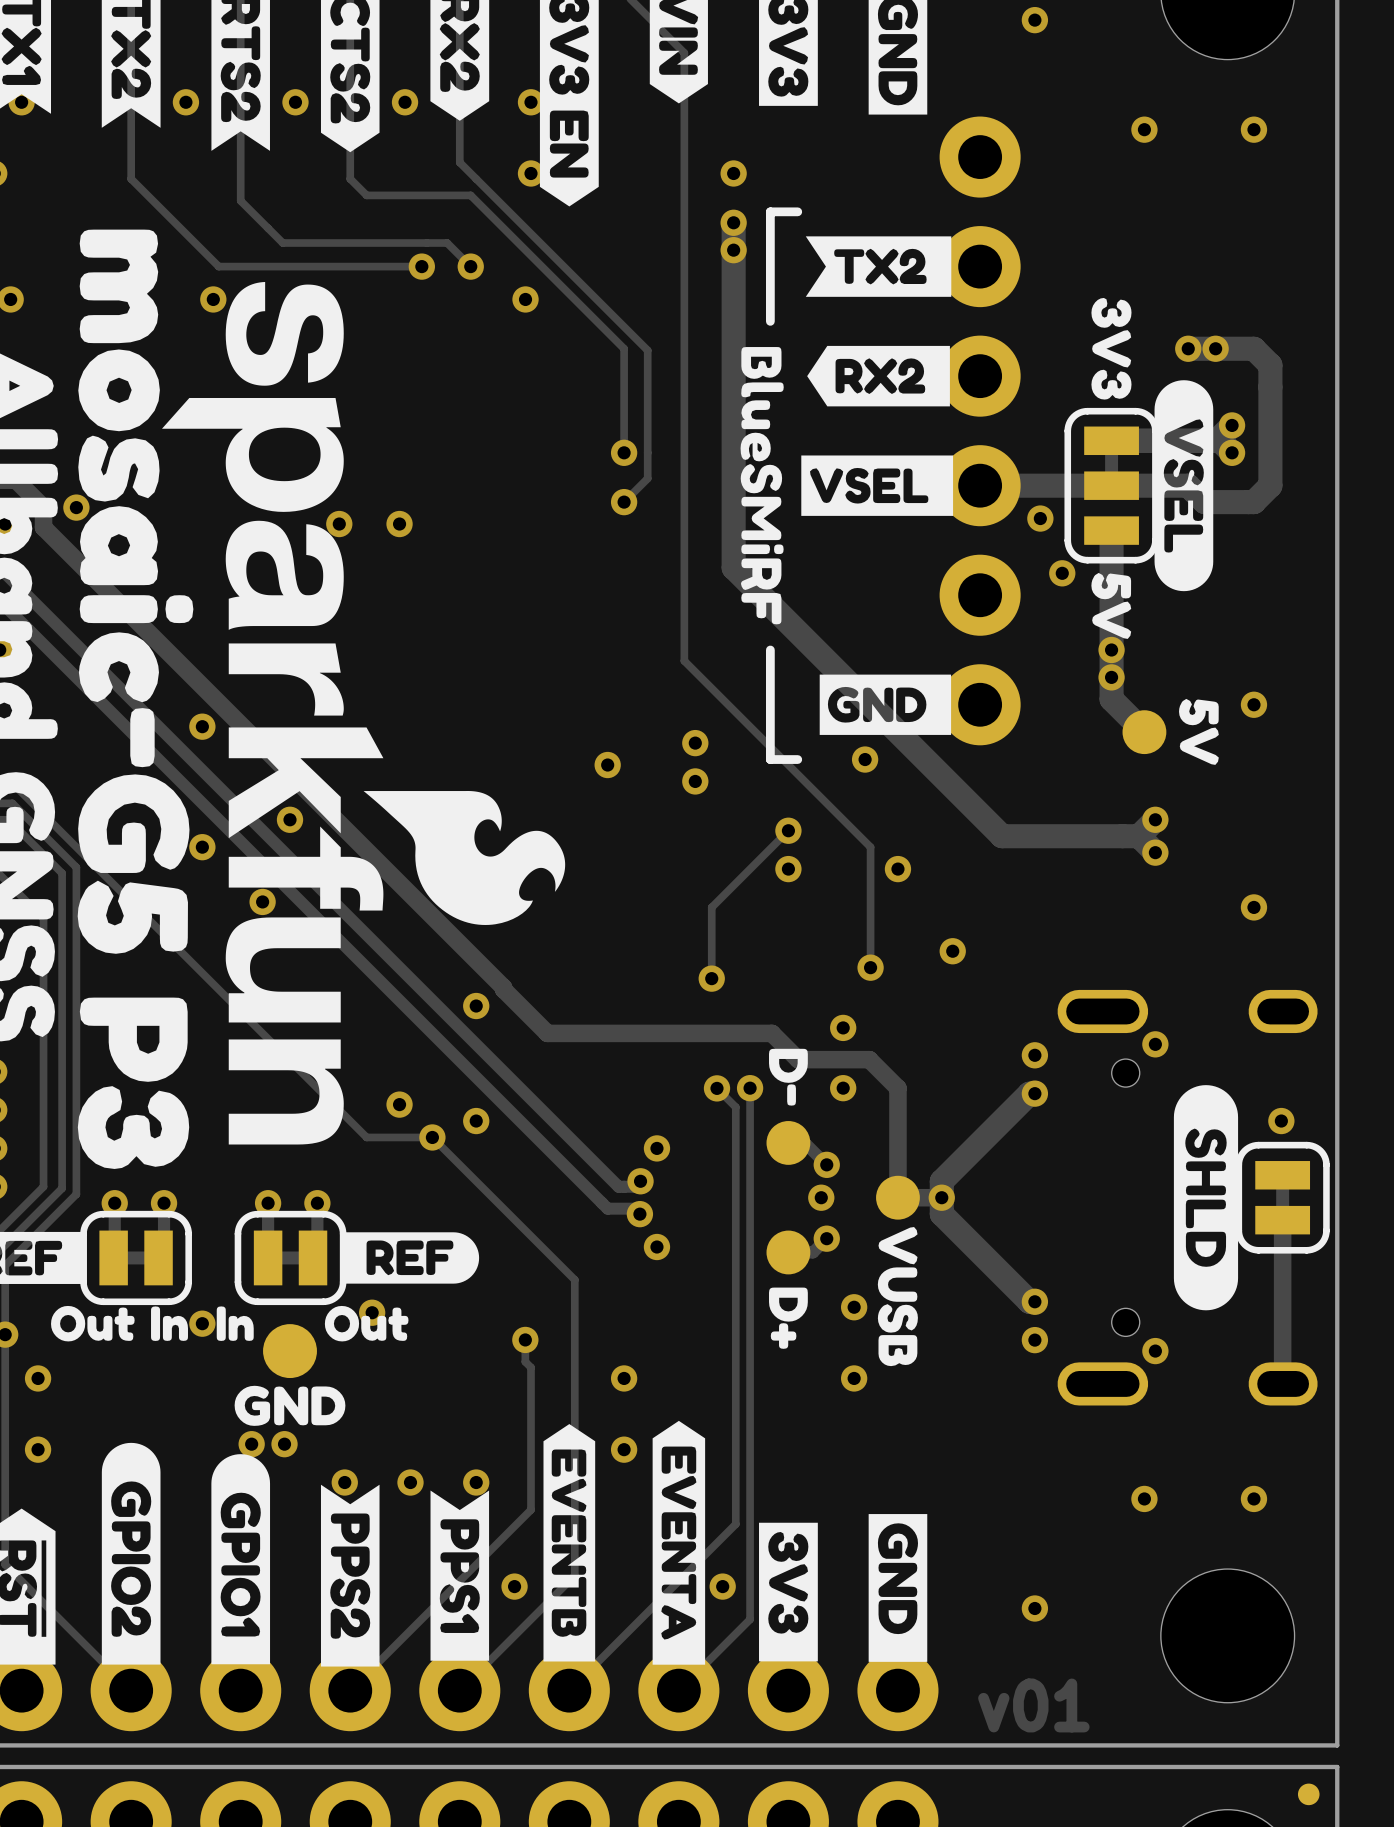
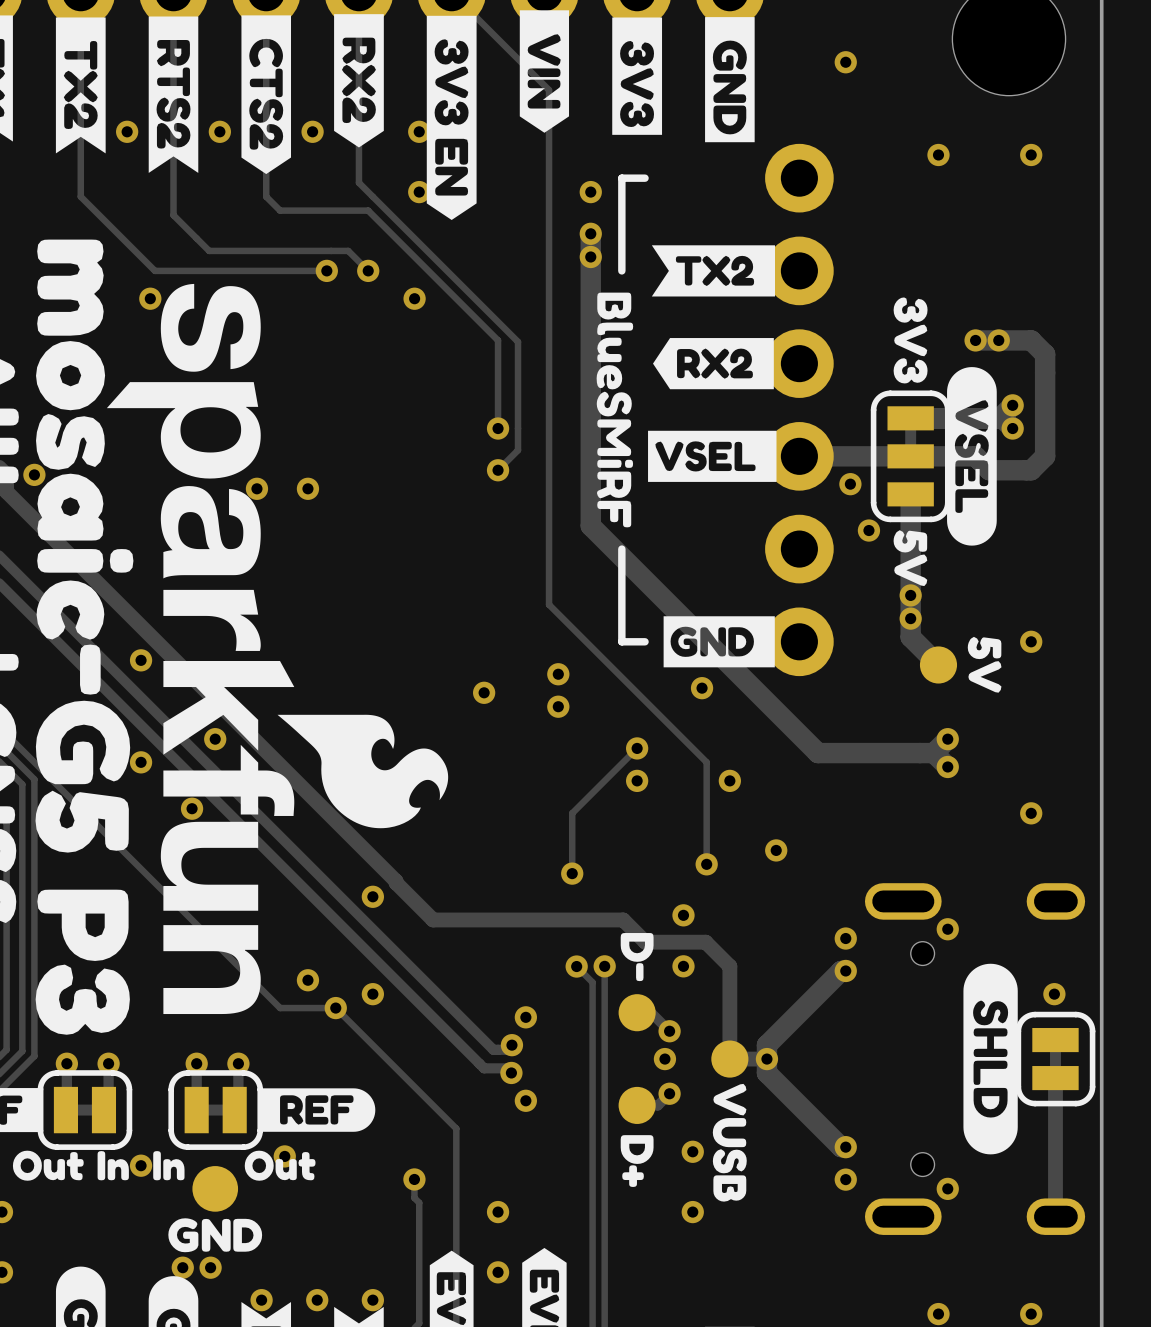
line: (797, 211) (770, 211) -> (645, 178) (621, 178) (621, 224)
line: (770, 266) (770, 321) -> (621, 549) (621, 595)
drawing position: (762, 485) -> (614, 409)
line: (770, 704) (770, 759) (797, 759) -> (621, 641) (645, 641)

